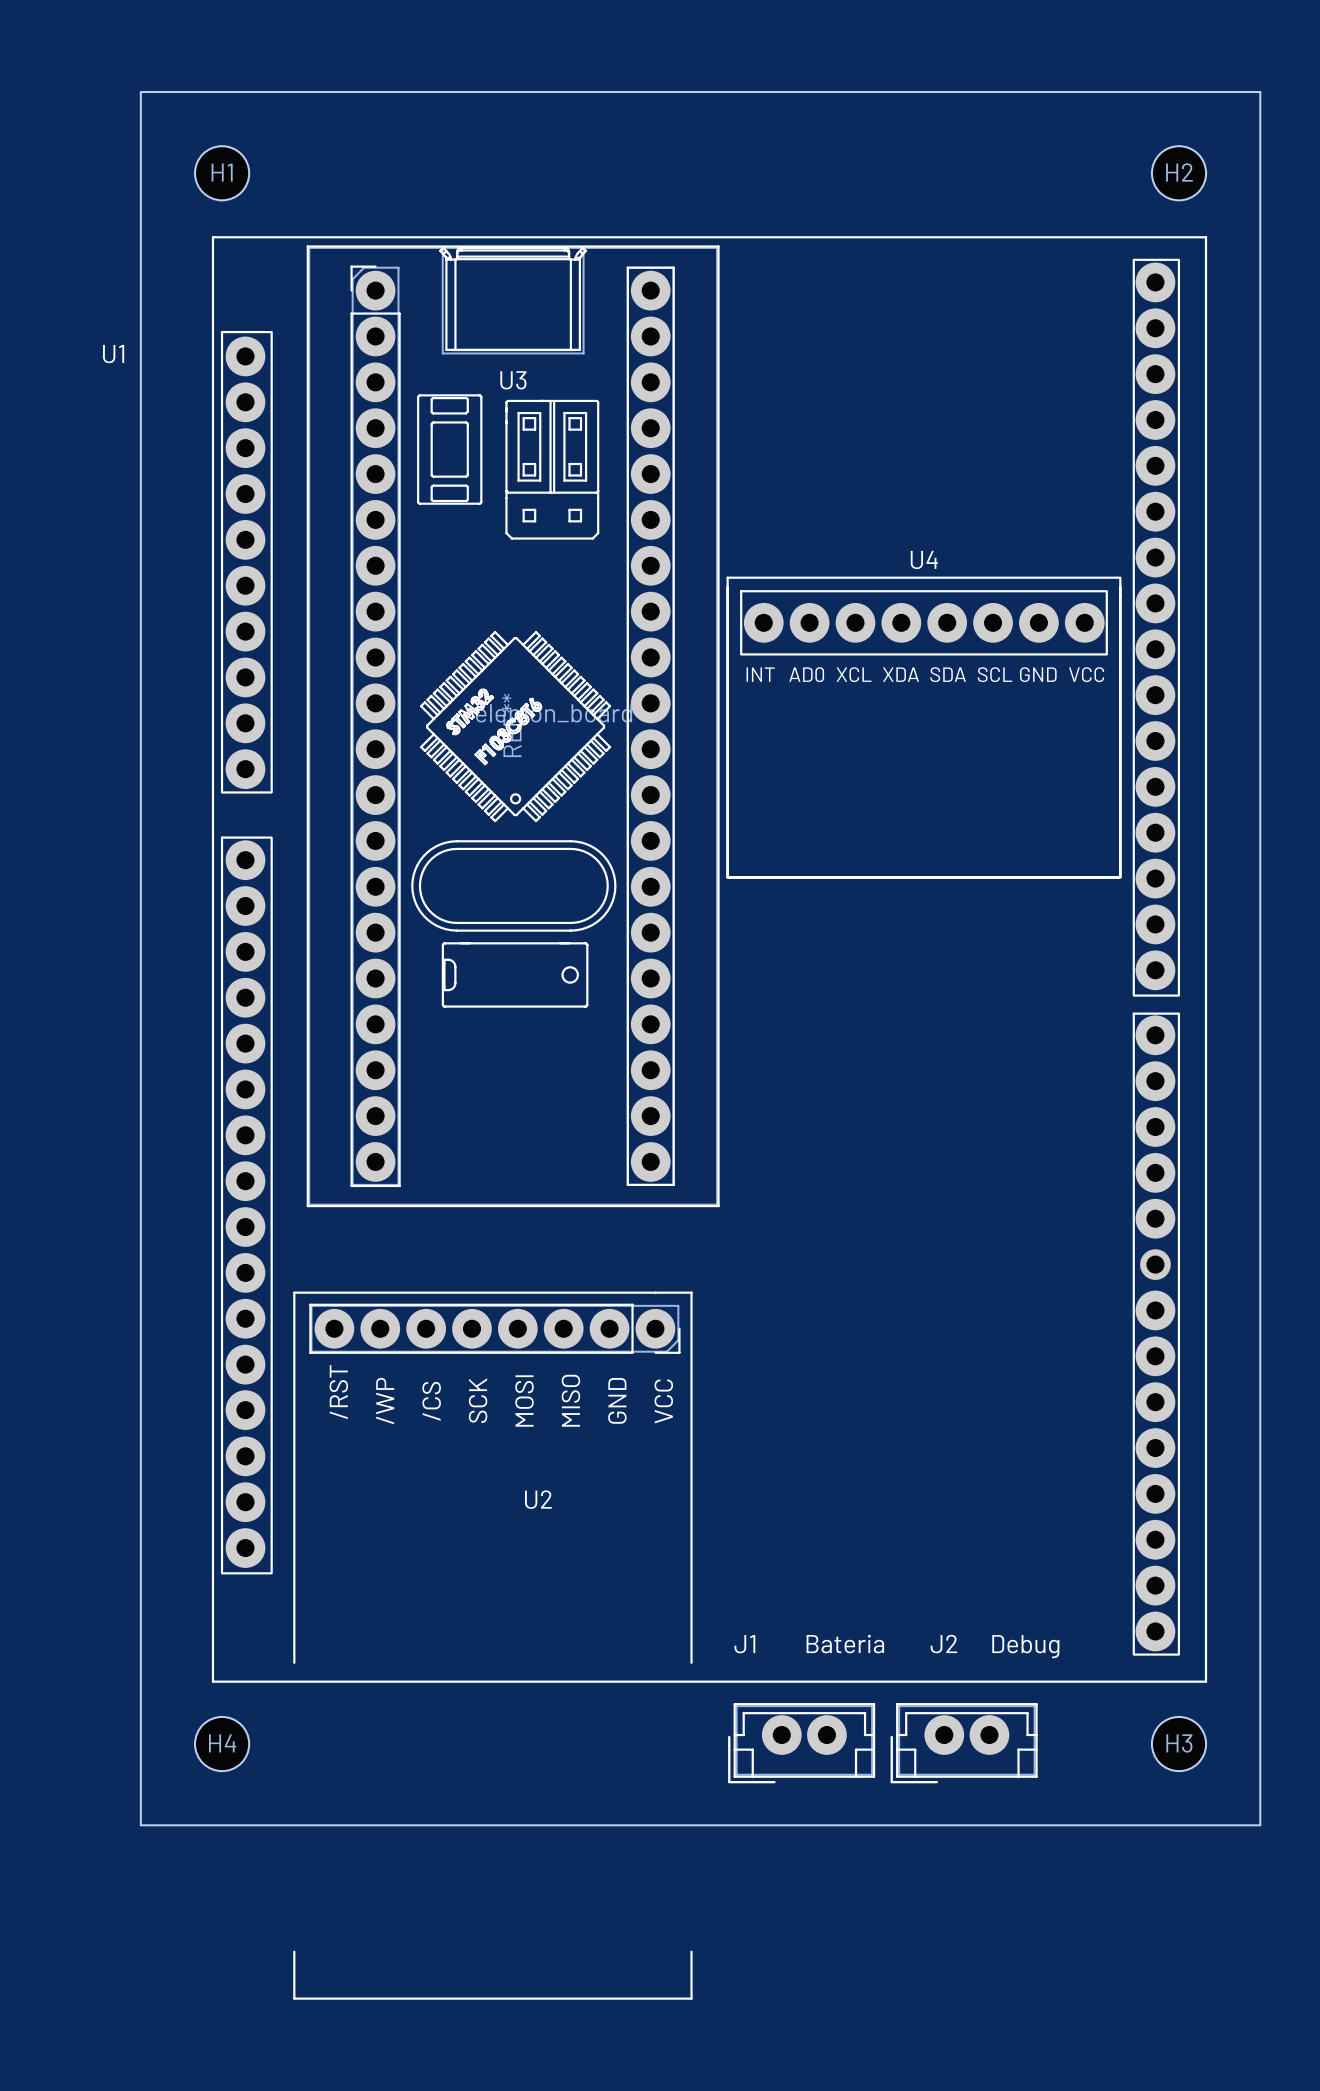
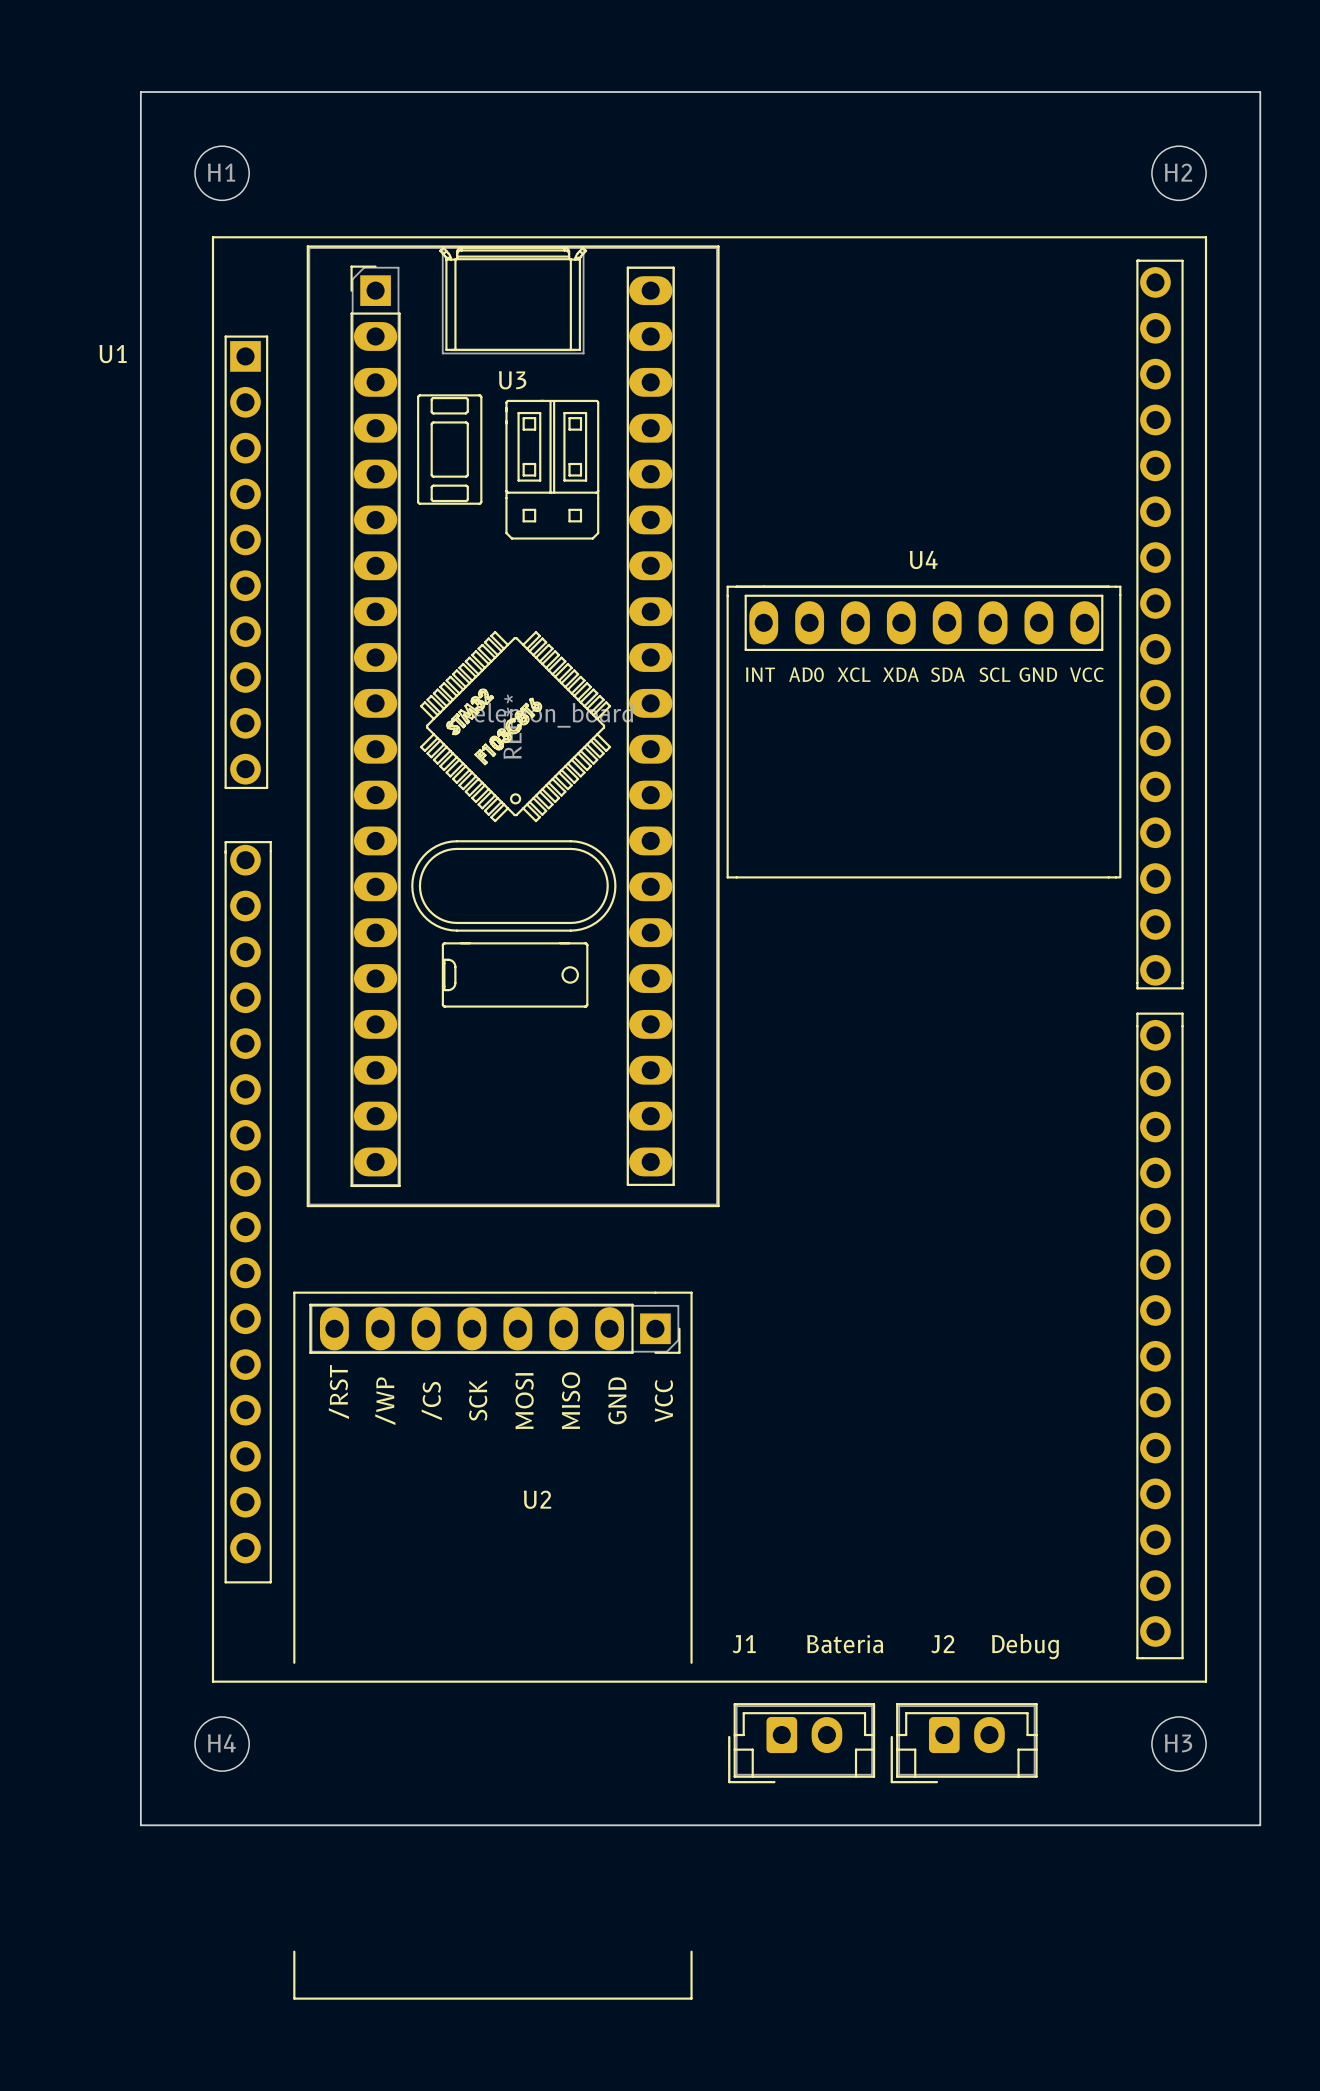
U1 footprint: [211, 236, 1208, 1683] -> [211, 236, 1208, 1683]
U3 footprint: [306, 245, 720, 1208] -> [306, 245, 720, 1208]
U4 footprint: [726, 576, 1122, 879] -> [726, 585, 1122, 879]
U2 footprint: [293, 1291, 693, 2000] -> [293, 1291, 693, 2000]
J1 footprint: [728, 1703, 876, 1784] -> [728, 1703, 876, 1784]
J2 footprint: [890, 1703, 1038, 1784] -> [890, 1703, 1038, 1784]

